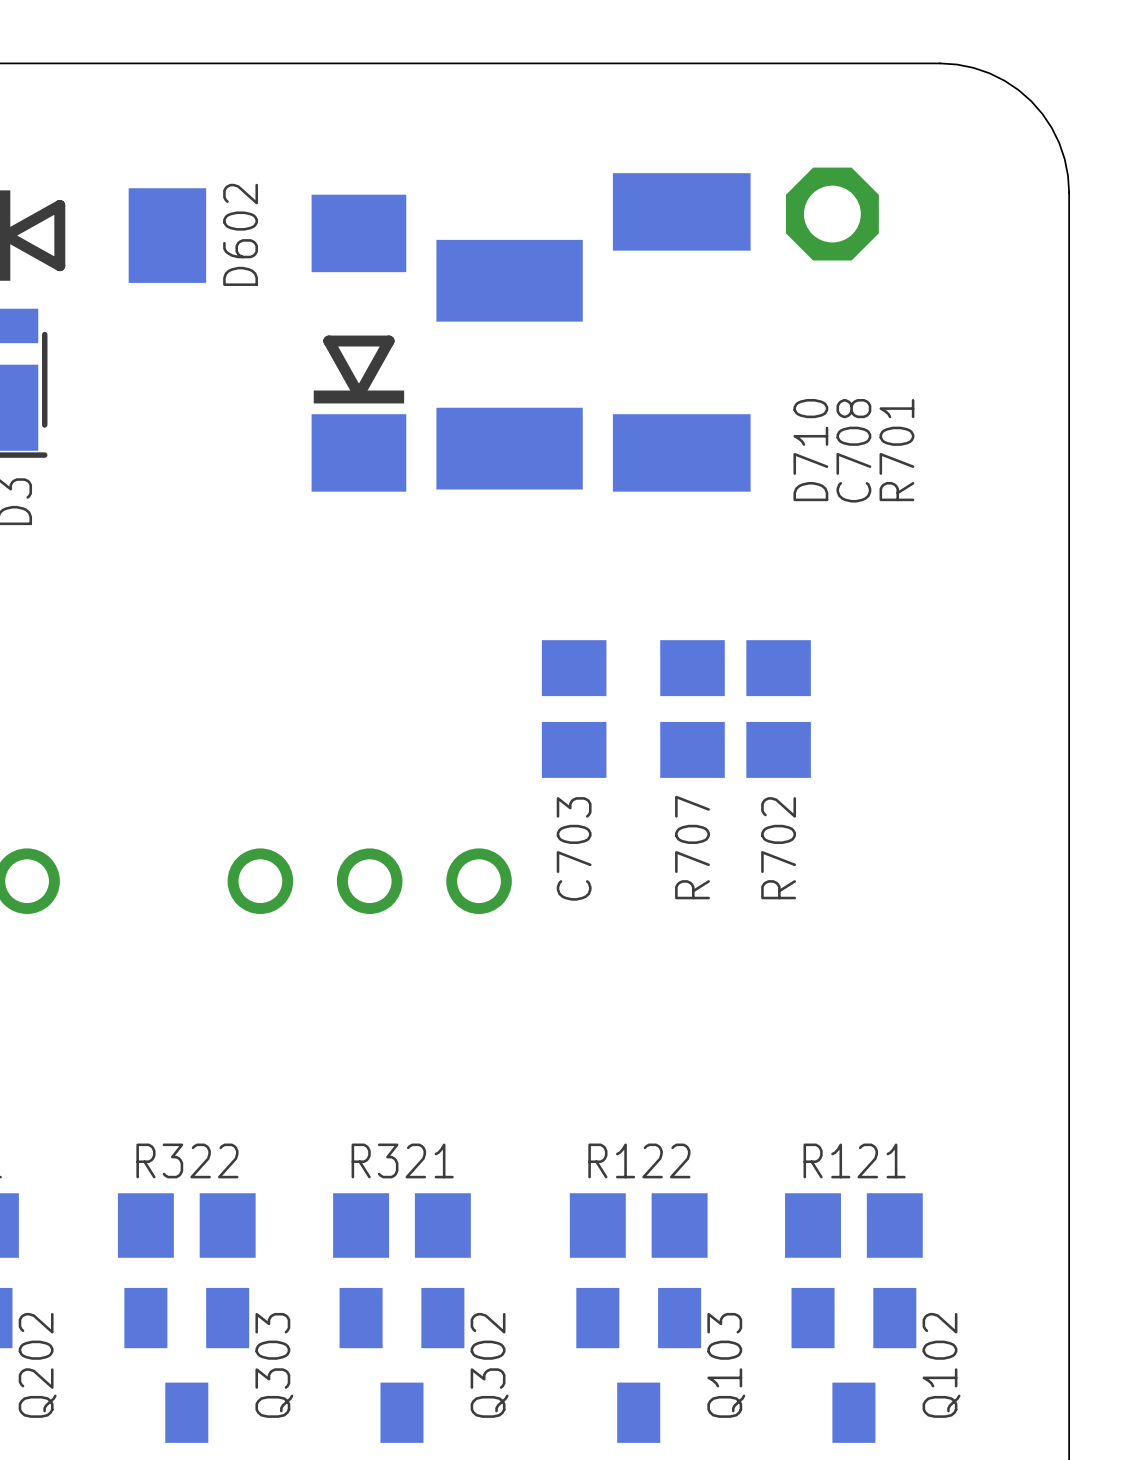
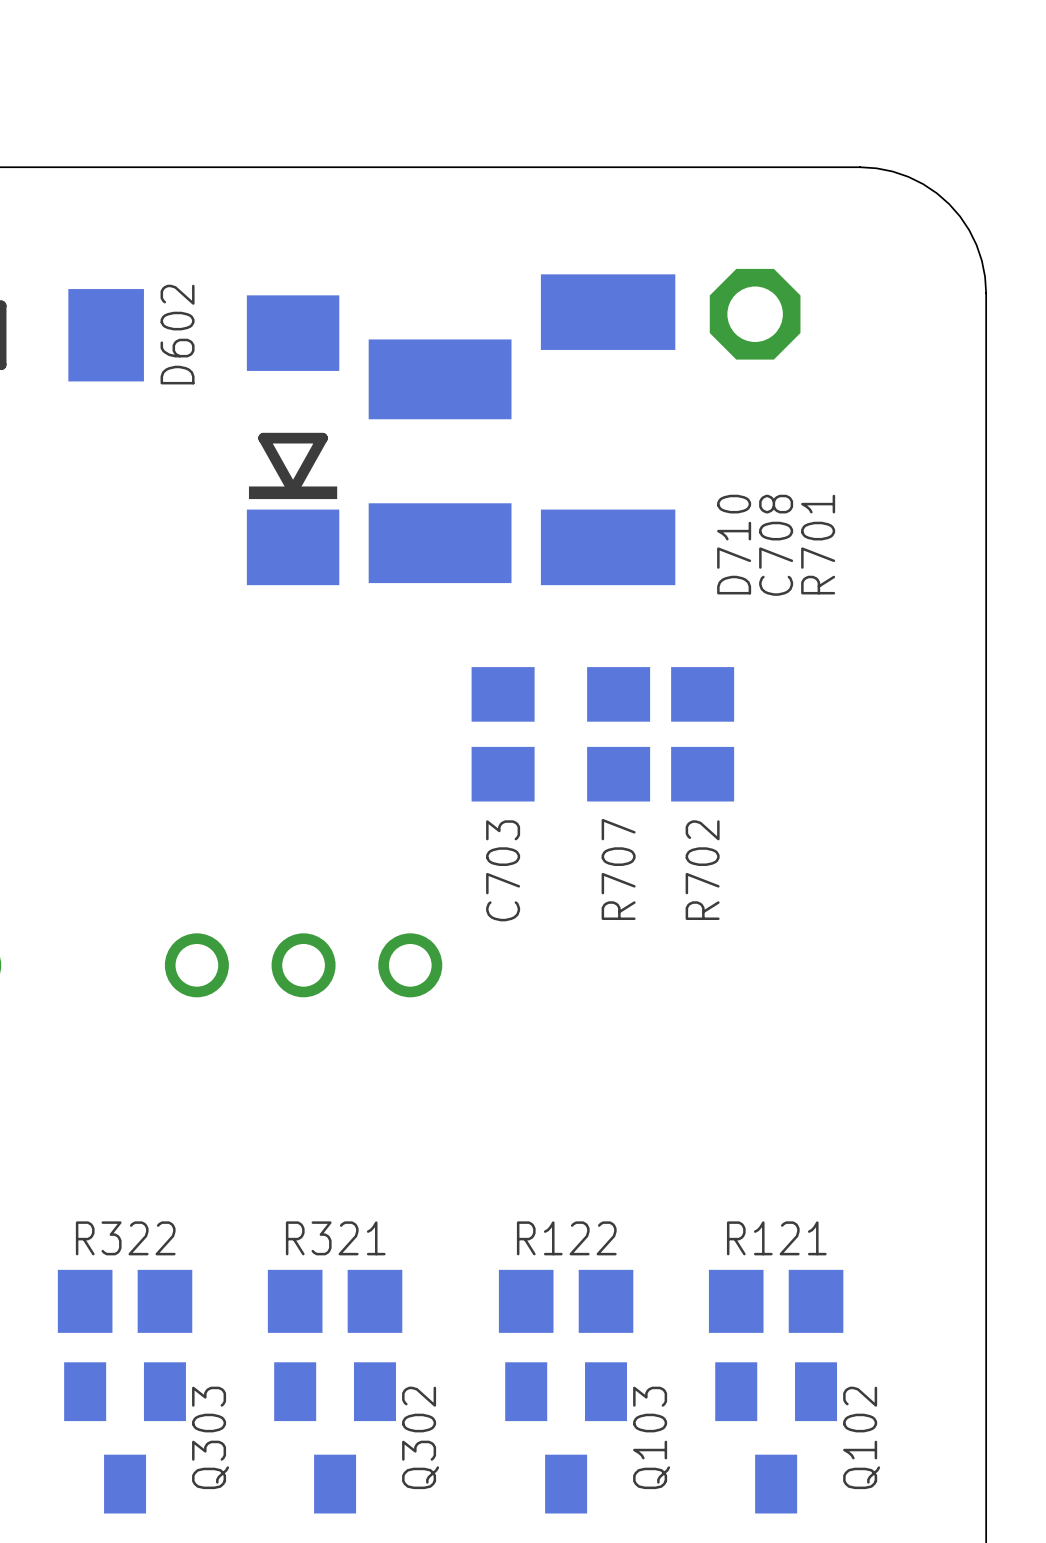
C703 position: (574, 709) -> (503, 734)
R707 position: (692, 709) -> (618, 734)
R702 position: (778, 709) -> (702, 734)

